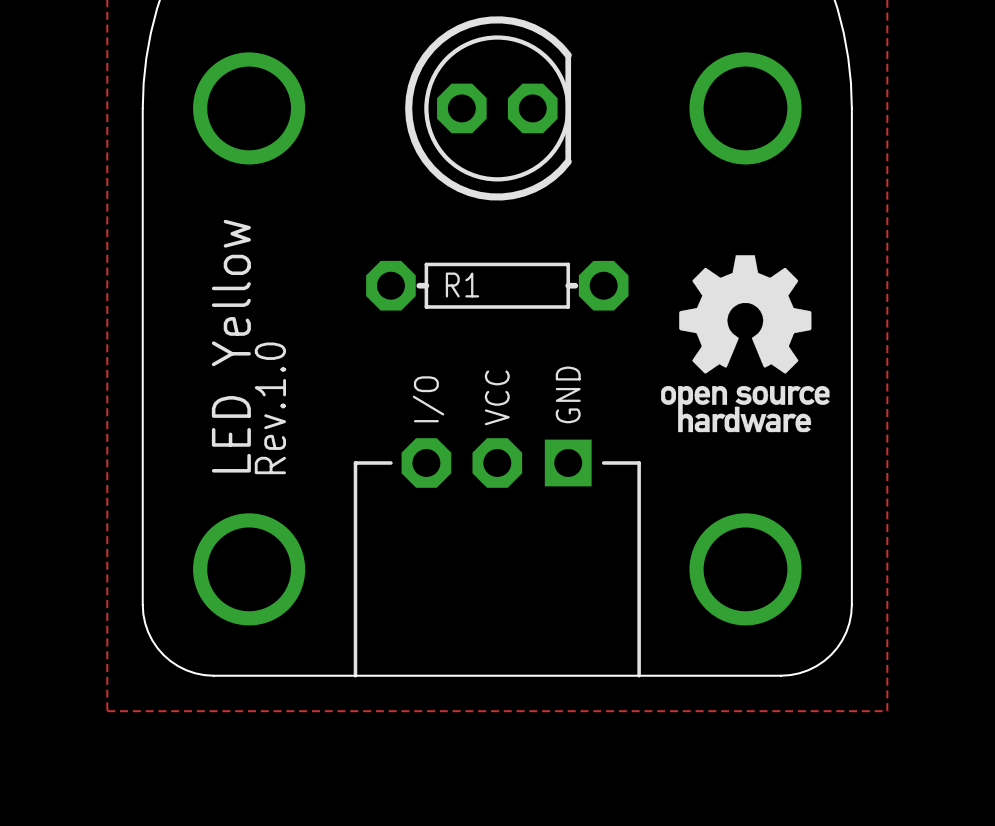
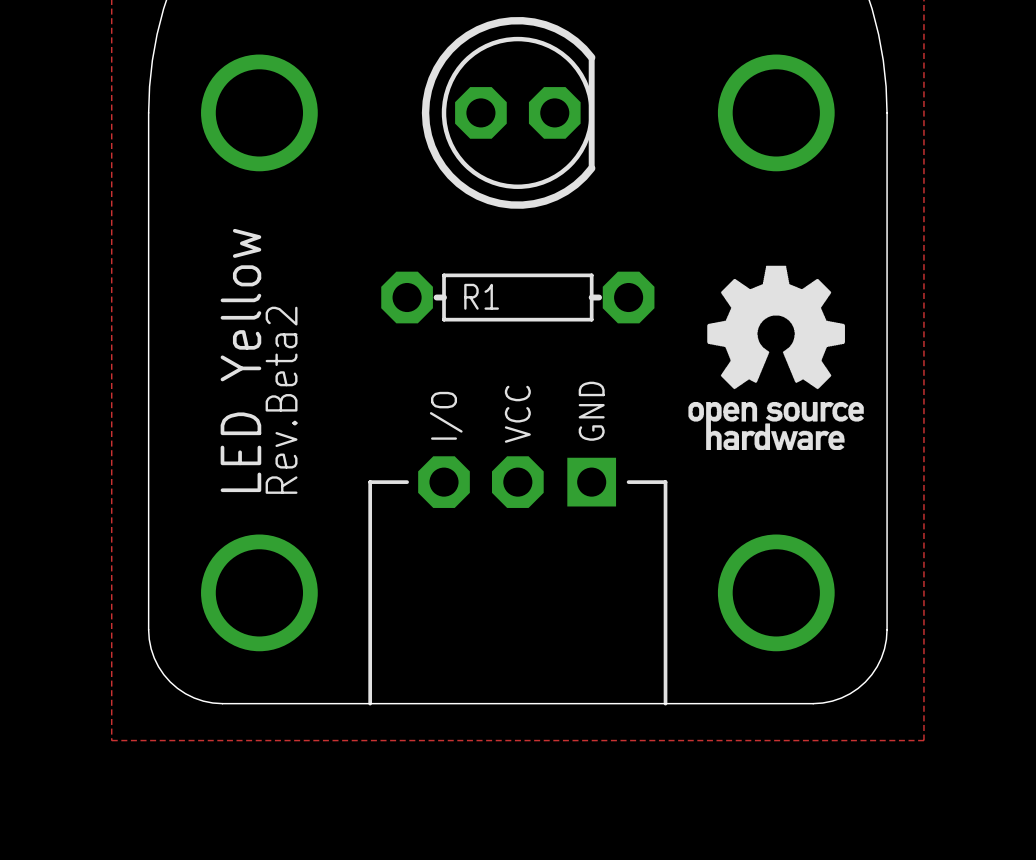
text: Rev.1.0 (270, 408) -> Rev.Beta2 (281, 400)

